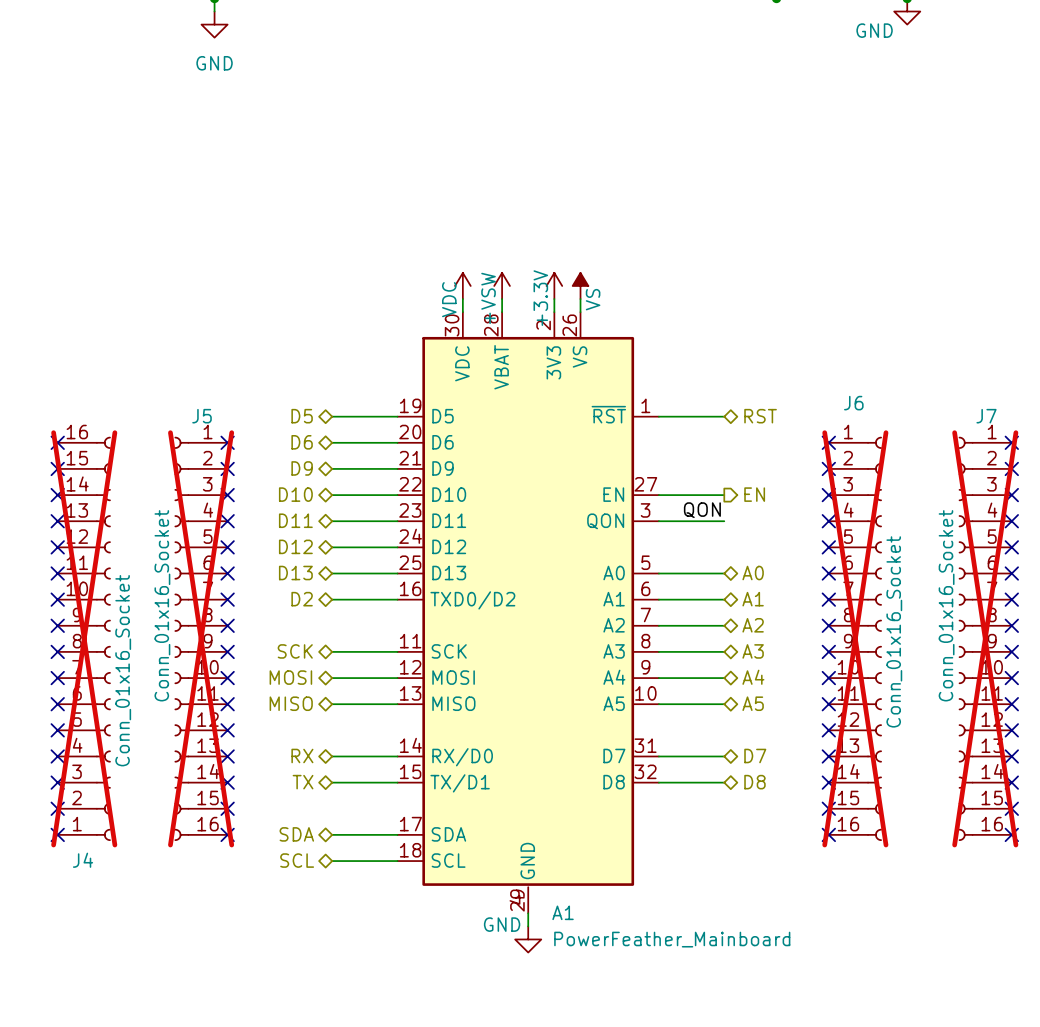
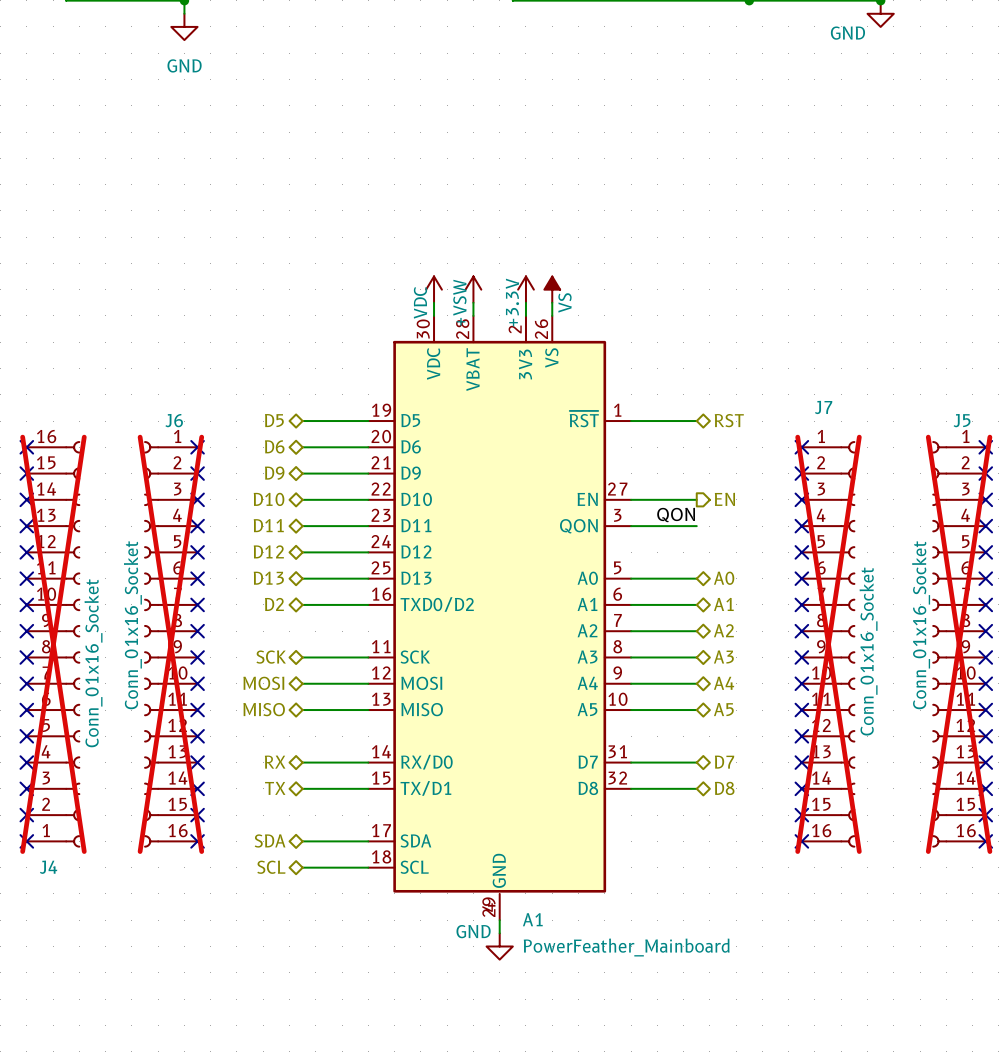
J6 name: J6 (853, 403) -> J7 (823, 407)
J5 name: J5 (202, 416) -> J6 (174, 420)
J7 name: J7 (986, 416) -> J5 (962, 420)

